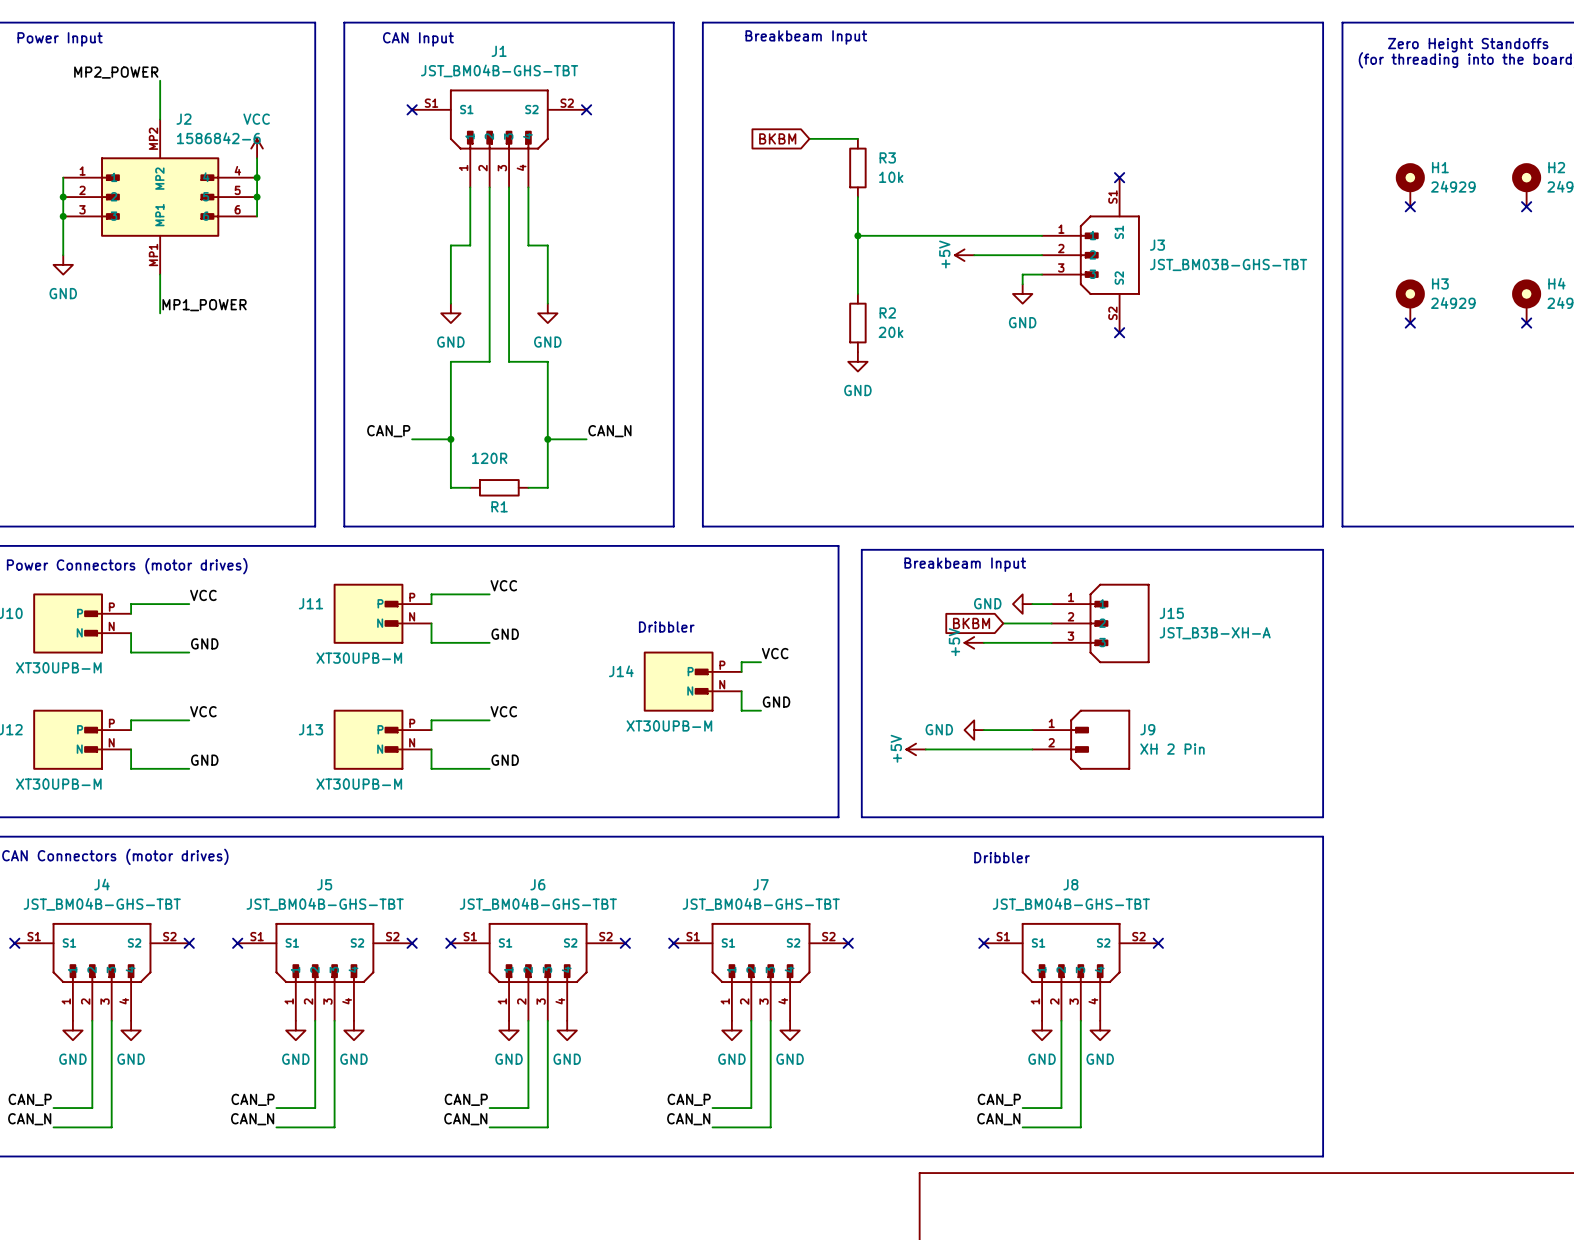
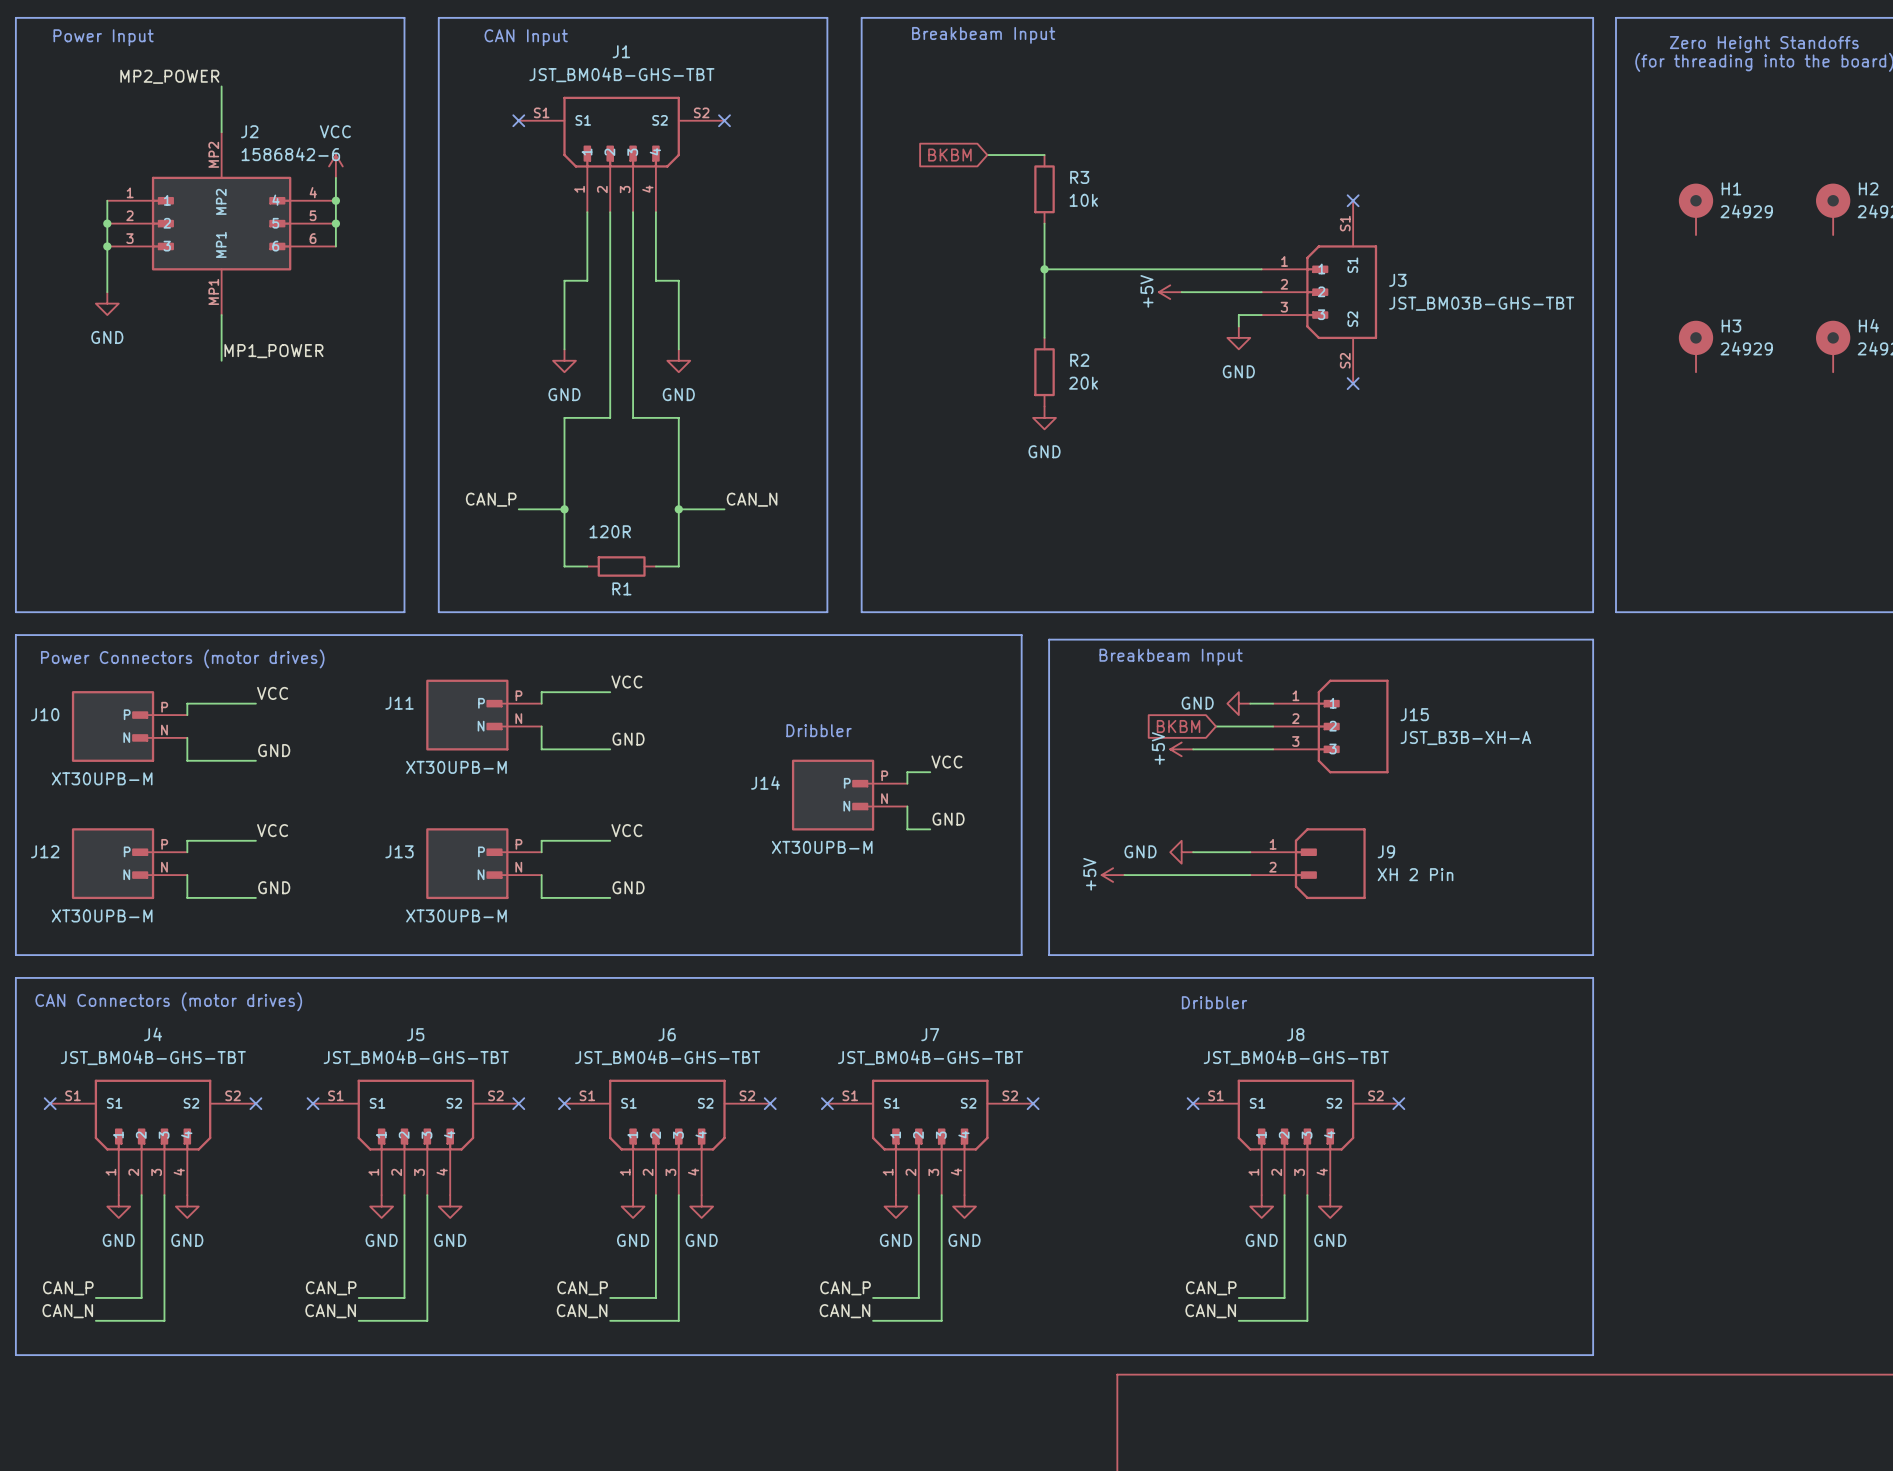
no-connect mark: (1410, 206) -> none
no-connect mark: (1526, 206) -> none
no-connect mark: (1410, 323) -> none
no-connect mark: (1526, 323) -> none

